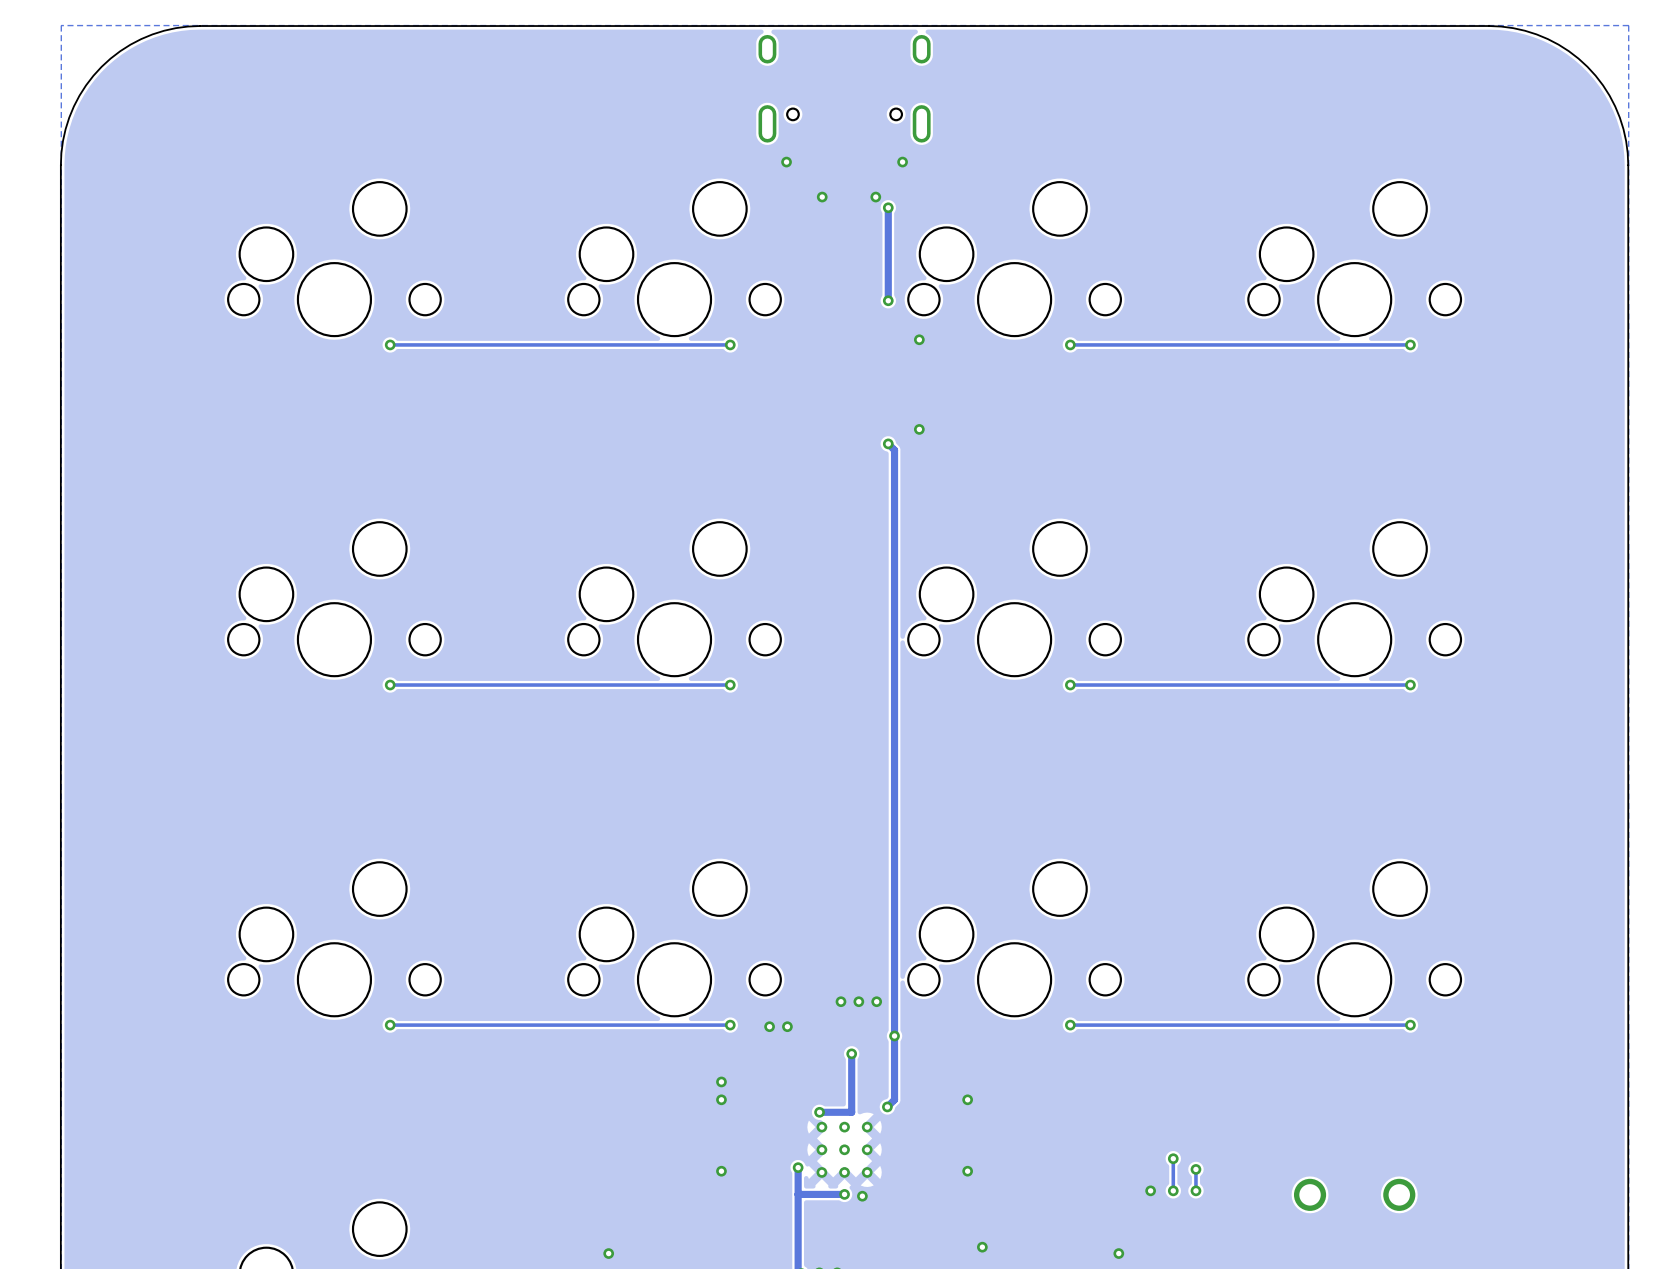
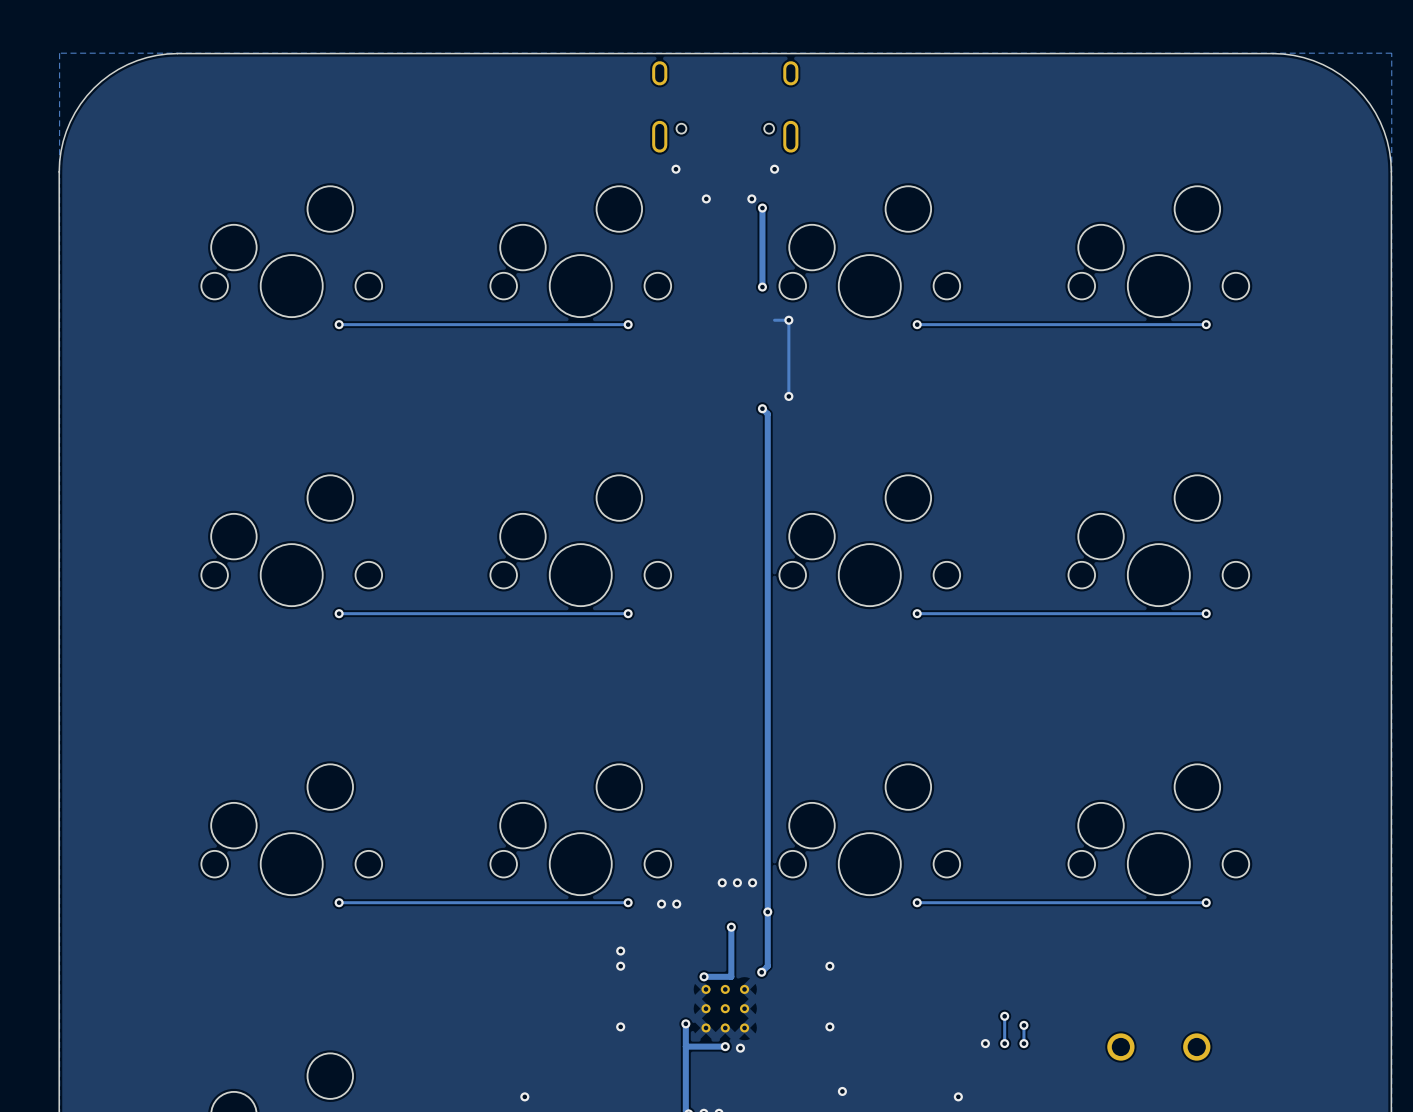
track: none -> (774, 320) (788, 320) (788, 396)

